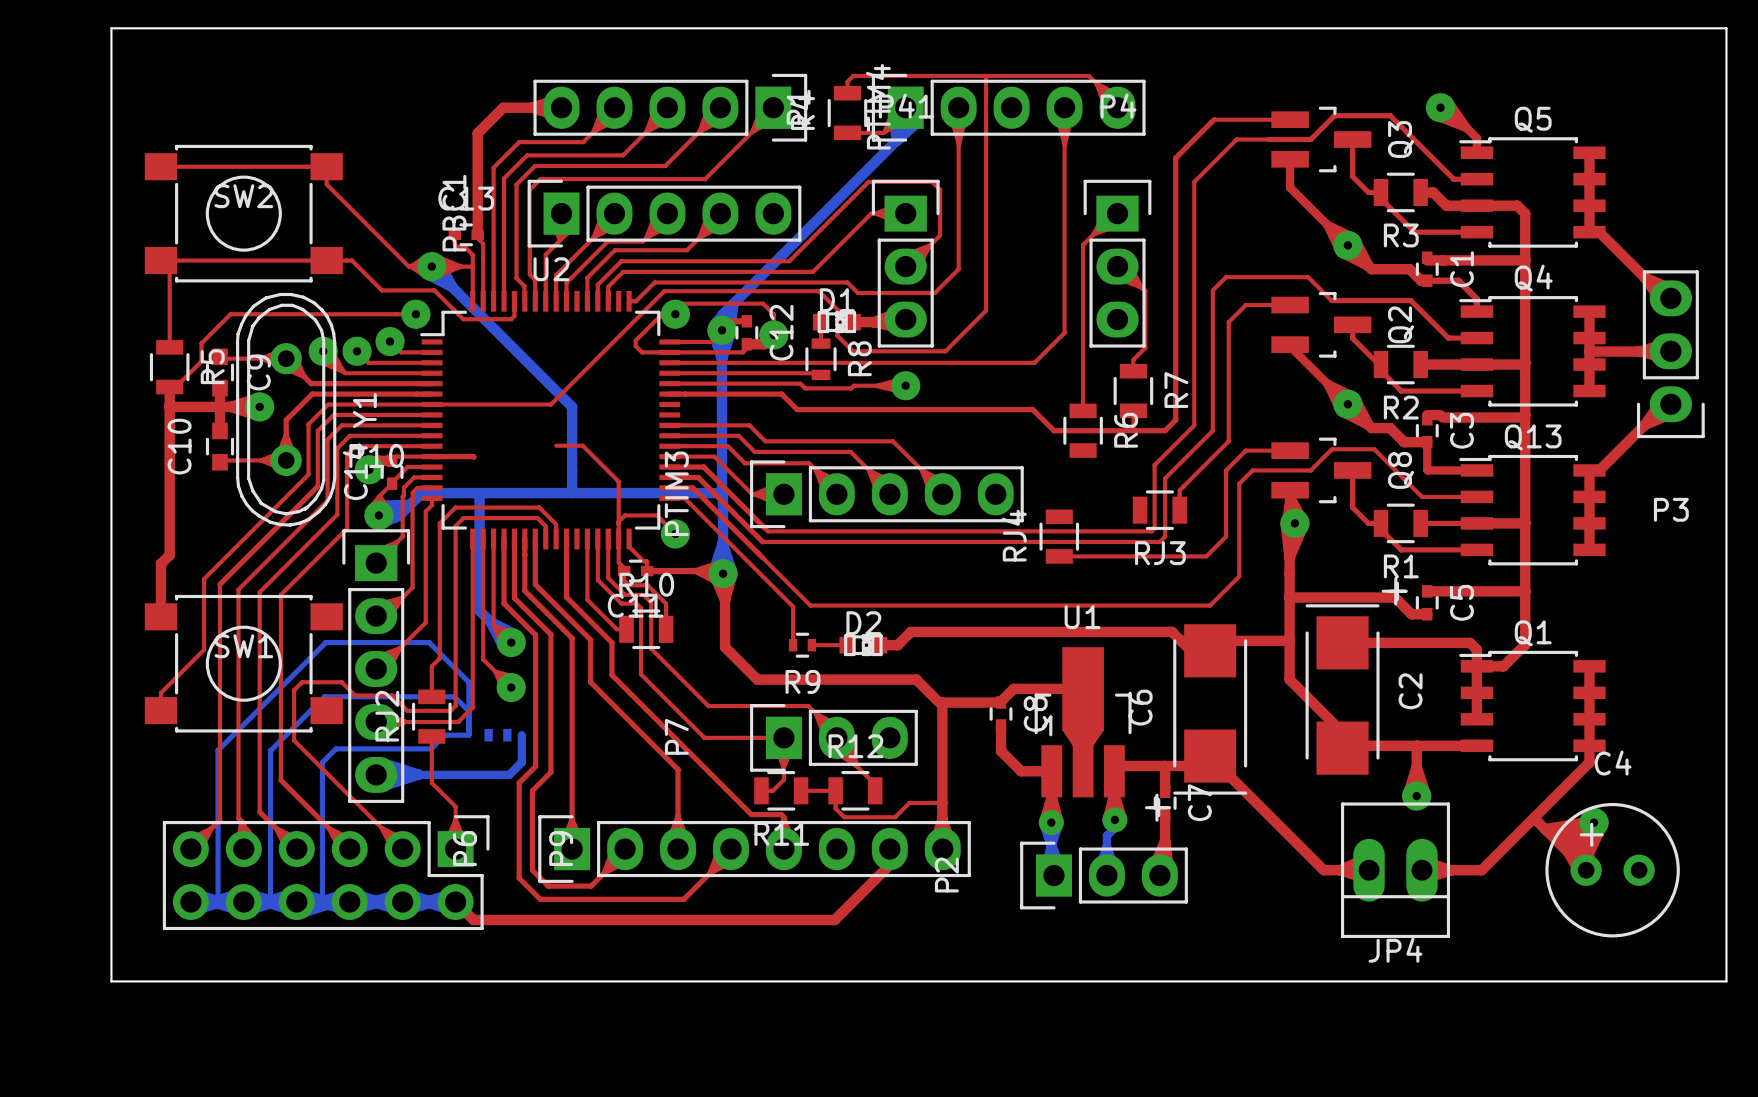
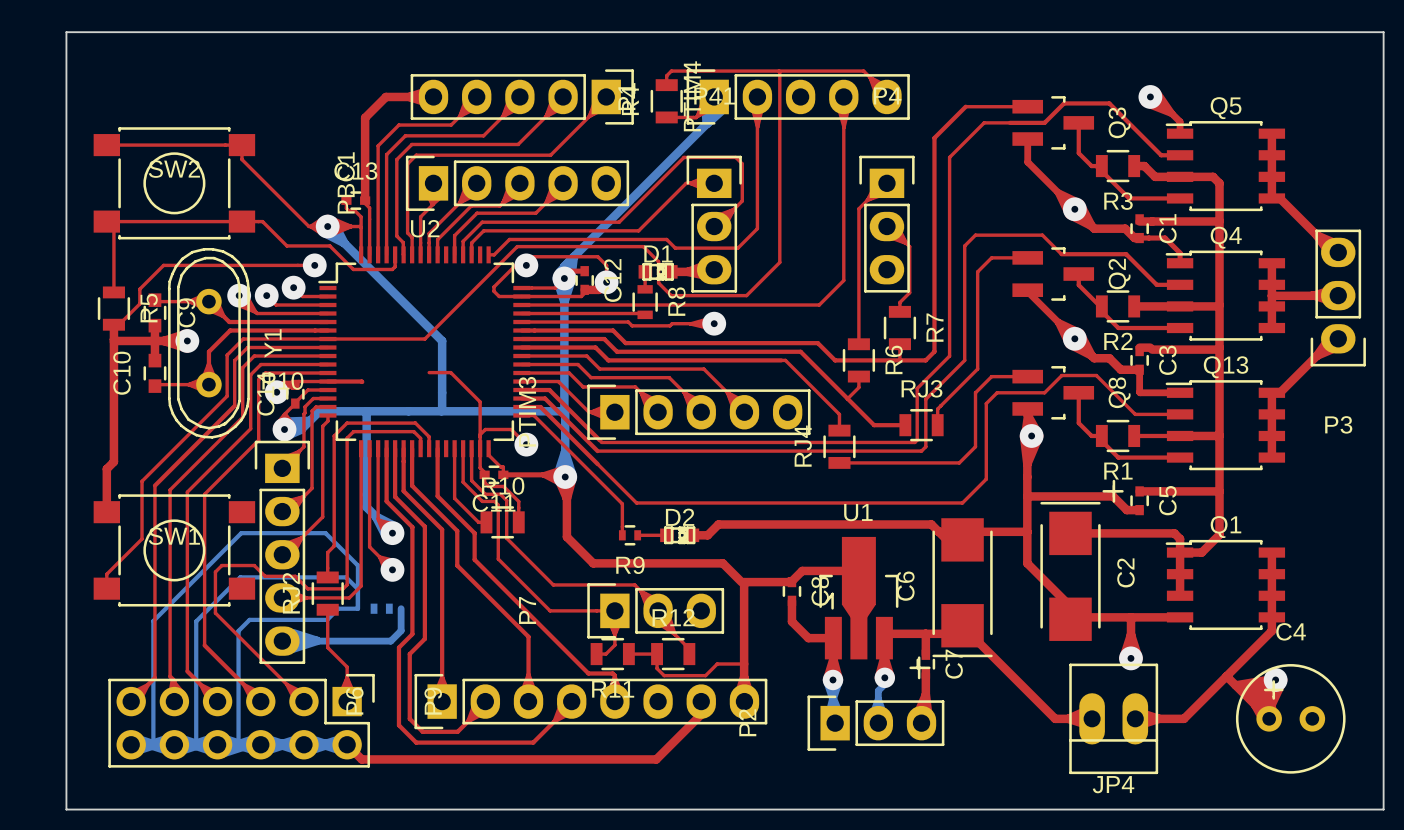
top track: none -> (521, 339) (604, 339) (617, 351) (800, 351) (874, 425) (905, 425)
top track: none -> (521, 347) (595, 347) (608, 360) (785, 360) (839, 414) (839, 430)
top track: none -> (858, 376) (858, 387) (847, 398)
RJ3 name position: RJ3 (1160, 553) -> RJ3 (921, 388)

